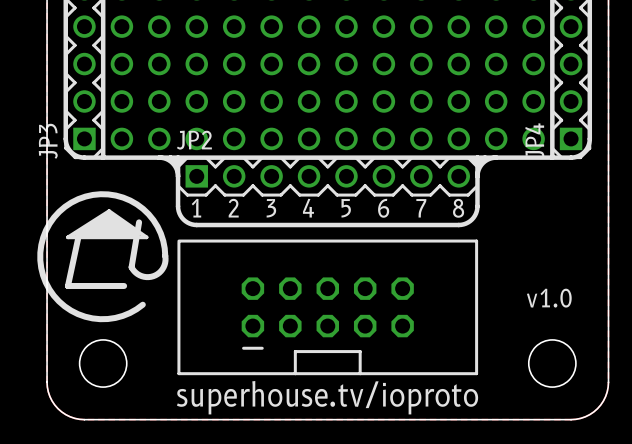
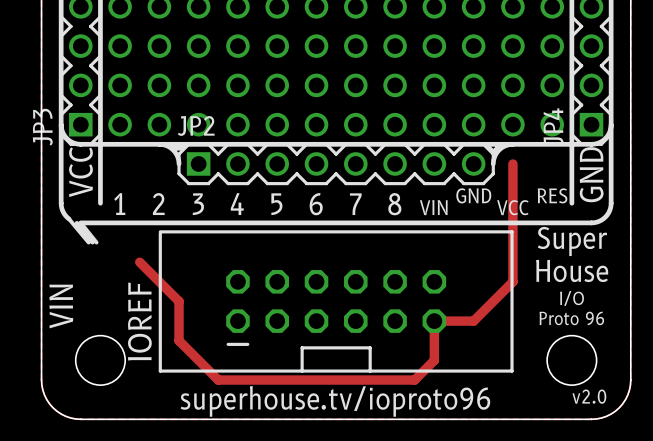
line: none -> (61, 124) (61, 207) (65, 215) (88, 242)
line: none -> (611, 124) (610, 205) (607, 215) (596, 222) (80, 222) (96, 242)
line: none -> (100, 144) (100, 203)
line: (178, 157) (178, 211) (185, 221) (196, 225) (463, 224) (472, 219) (476, 211) (477, 157) -> none
line: none -> (571, 144) (571, 203)
track: none -> (512, 163) (512, 281) (473, 321) (434, 321) (434, 360) (414, 380) (218, 380) (179, 340) (179, 301) (139, 262)
text: none -> VCC (80, 172)
text: none -> GND (591, 174)
text: none -> GND (473, 195)
text: none -> RES (552, 195)
text position: 1 (196, 208) -> 1 (119, 204)
text position: 2 (233, 208) -> 2 (158, 204)
text position: 3 (271, 208) -> 3 (198, 204)
text position: 4 (308, 208) -> 4 (237, 204)
text position: 5 (346, 208) -> 5 (276, 204)
text position: 6 (383, 208) -> 6 (316, 204)
text position: 7 (421, 208) -> 7 (355, 204)
text position: 8 (458, 208) -> 8 (394, 204)
line: (109, 211) (67, 237) (146, 237) (109, 211) -> none
text: none -> VIN (433, 207)
text: none -> VCC (512, 207)
line: (109, 222) (101, 226) (120, 226) (109, 218) (86, 229) (127, 229) -> none
line: (139, 222) (131, 267) (141, 276) (153, 276) (160, 271) (165, 260) (163, 240) (157, 226) (148, 214) (136, 204) (123, 197) (108, 194) (85, 196) (71, 202) (59, 211) (45, 230) (41, 245) (40, 260) (43, 275) (53, 295) (64, 306) (77, 314) (100, 319) (115, 317) (129, 313) (142, 304) -> none
line: none -> (76, 222) (92, 242)
line: (75, 233) (135, 233) (109, 214) (79, 233) (67, 285) (124, 285) -> none
part footprint: [177, 239, 479, 376] -> [158, 230, 514, 373]
text: none -> Super (572, 241)
text: none -> House (572, 270)
text: v1.0 (549, 298) -> none
text: none -> I/O (572, 298)
text: none -> VIN (61, 306)
text: none -> Proto 96 (571, 318)
text: none -> IOREF (139, 321)
text: superhouse.tv/ioproto (327, 397) -> superhouse.tv/ioproto96 (335, 401)
text: none -> v2.0 (589, 396)

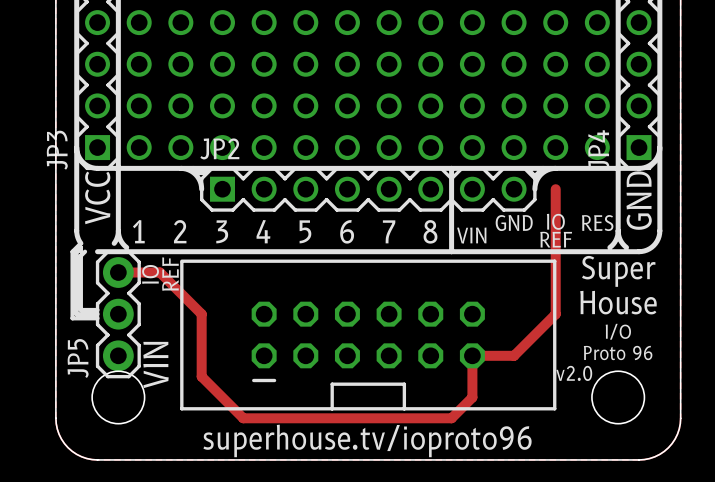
line: none -> (451, 168) (451, 251)
text: none -> IO (555, 221)
line: (61, 203) (64, 214) (88, 242) -> (76, 230) (80, 243) (72, 251) (72, 318) (97, 318)
text: VCC (512, 207) -> REF (556, 239)
line: none -> (114, 243) (118, 230) (120, 240) (126, 247)
line: none -> (609, 247) (615, 240) (618, 230) (620, 240) (626, 247)
line: none -> (80, 251) (80, 247) (76, 251) (76, 314) (97, 314)
line: none -> (85, 251) (80, 255) (80, 310) (97, 310)
line: (76, 222) (92, 242) -> none
line: (80, 222) (96, 242) -> none
text: none -> IO (150, 274)
text: none -> REF (170, 274)
track: (139, 262) (179, 301) -> (118, 272) (160, 272) (201, 314) (201, 334)
JP5: none -> (118, 314)
text position: VIN (61, 306) -> VIN (156, 365)
text: IOREF (139, 321) -> none
text position: v2.0 (589, 396) -> v2.0 (574, 373)

